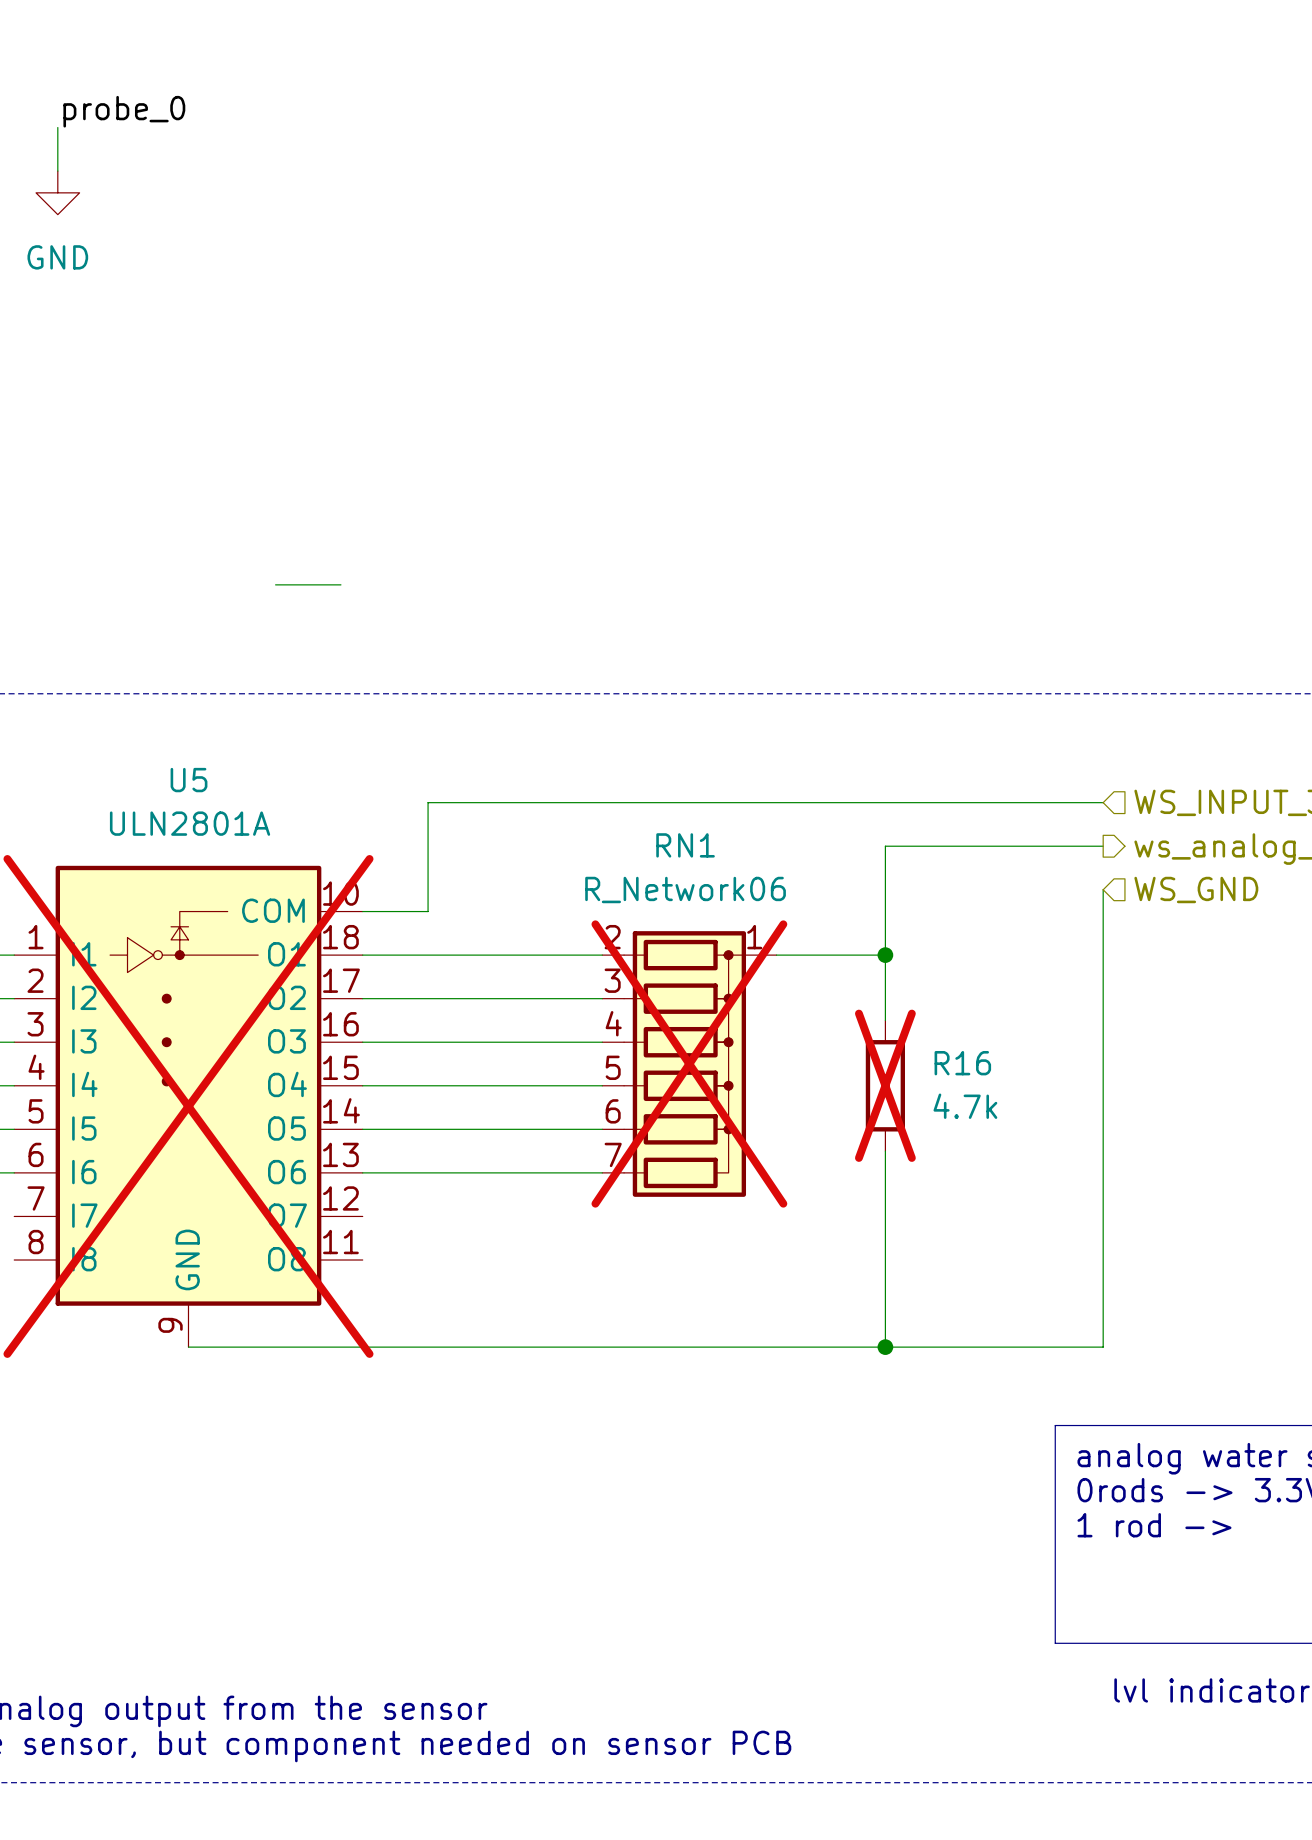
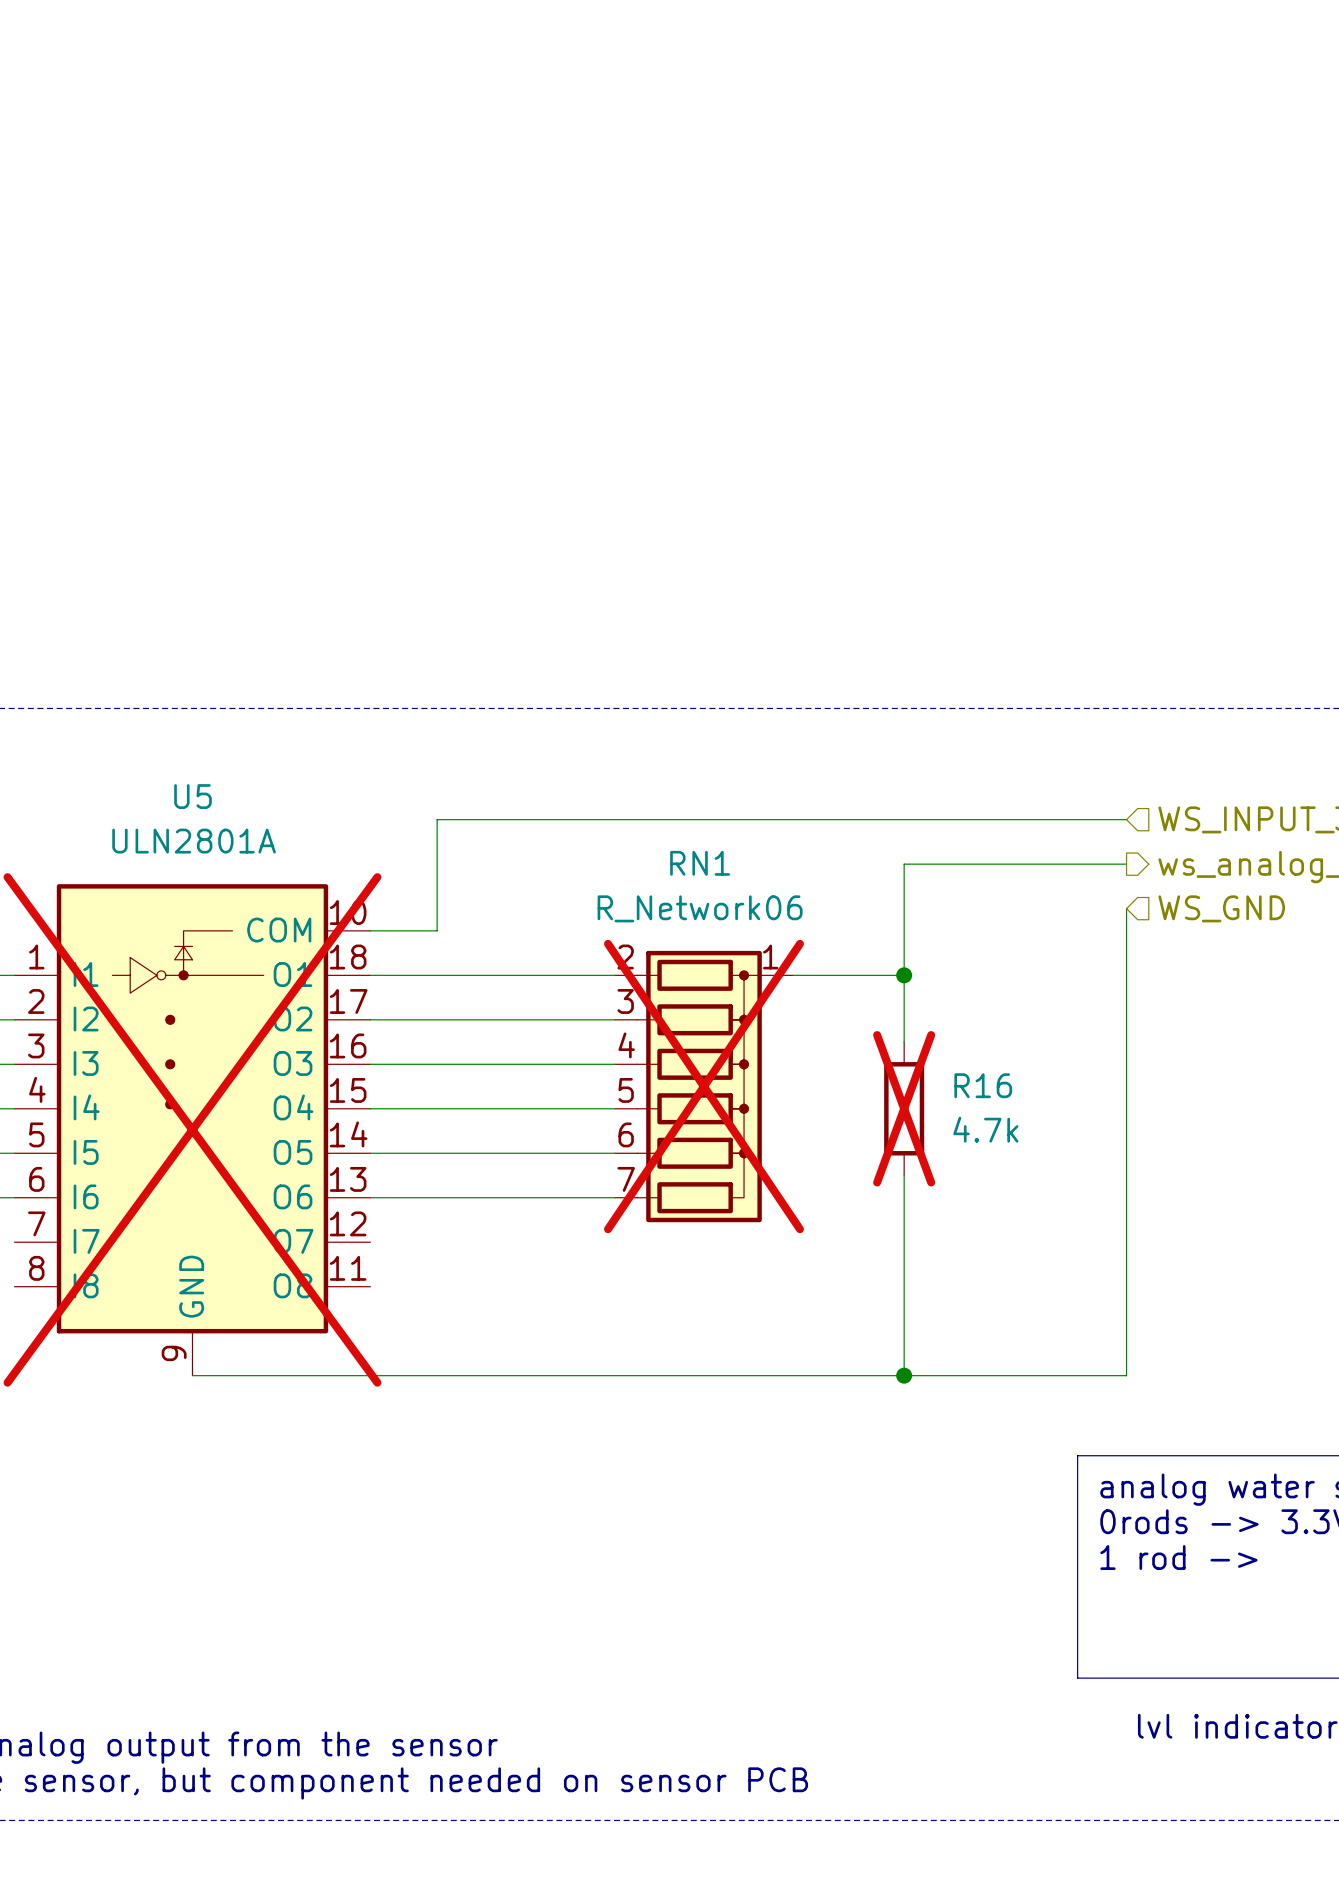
label: probe_0 (124, 111) -> none
wire: (57, 127) (57, 171) -> none
power symbol: GND (57, 192) -> none
wire: (275, 584) (340, 584) -> none

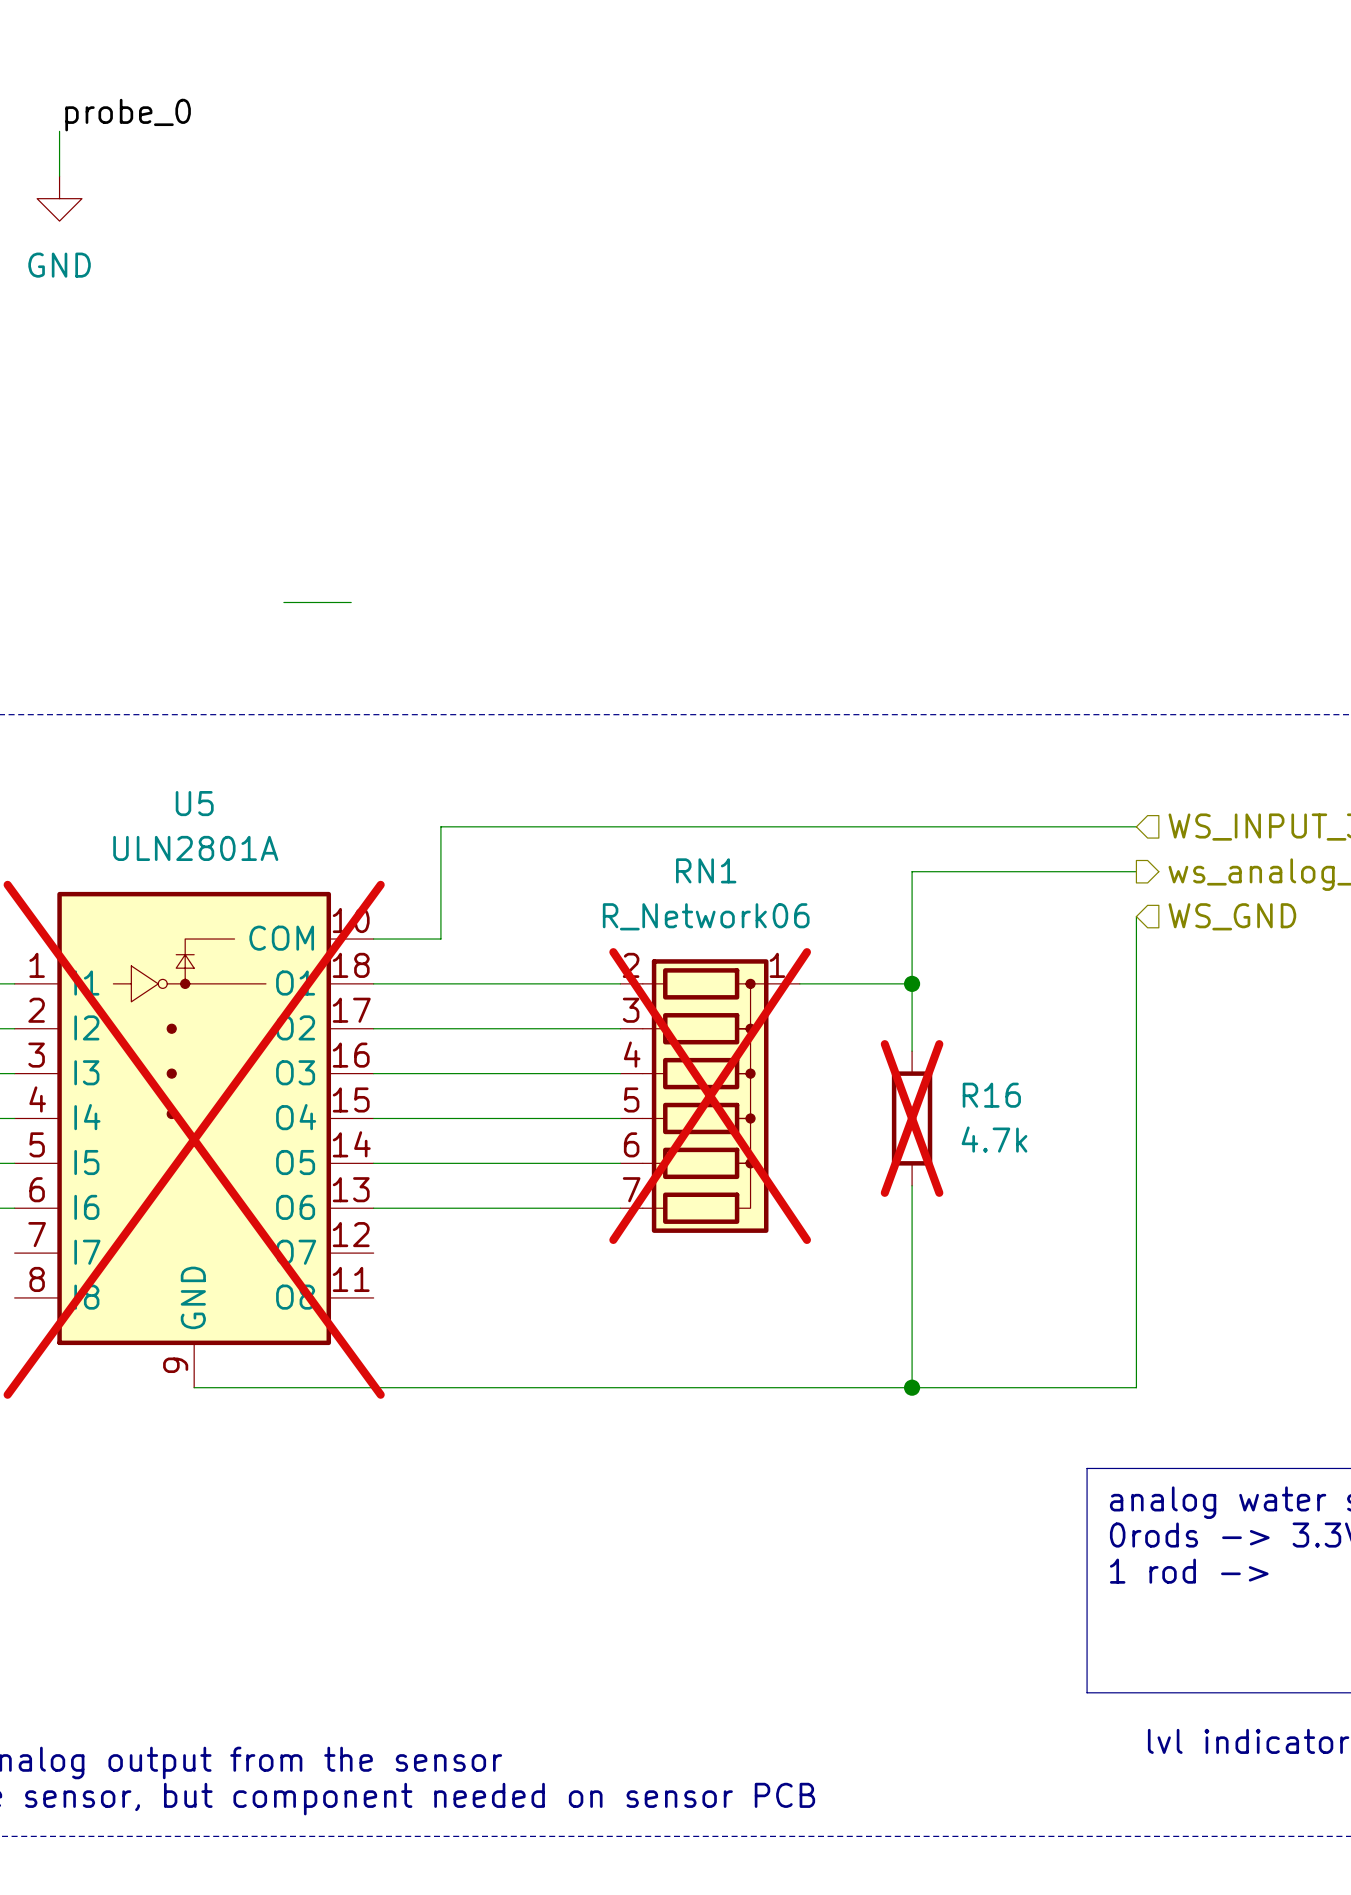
label: none -> probe_0 (128, 115)
wire: none -> (59, 131) (59, 176)
power symbol: none -> GND (59, 198)
wire: none -> (283, 602) (351, 602)

